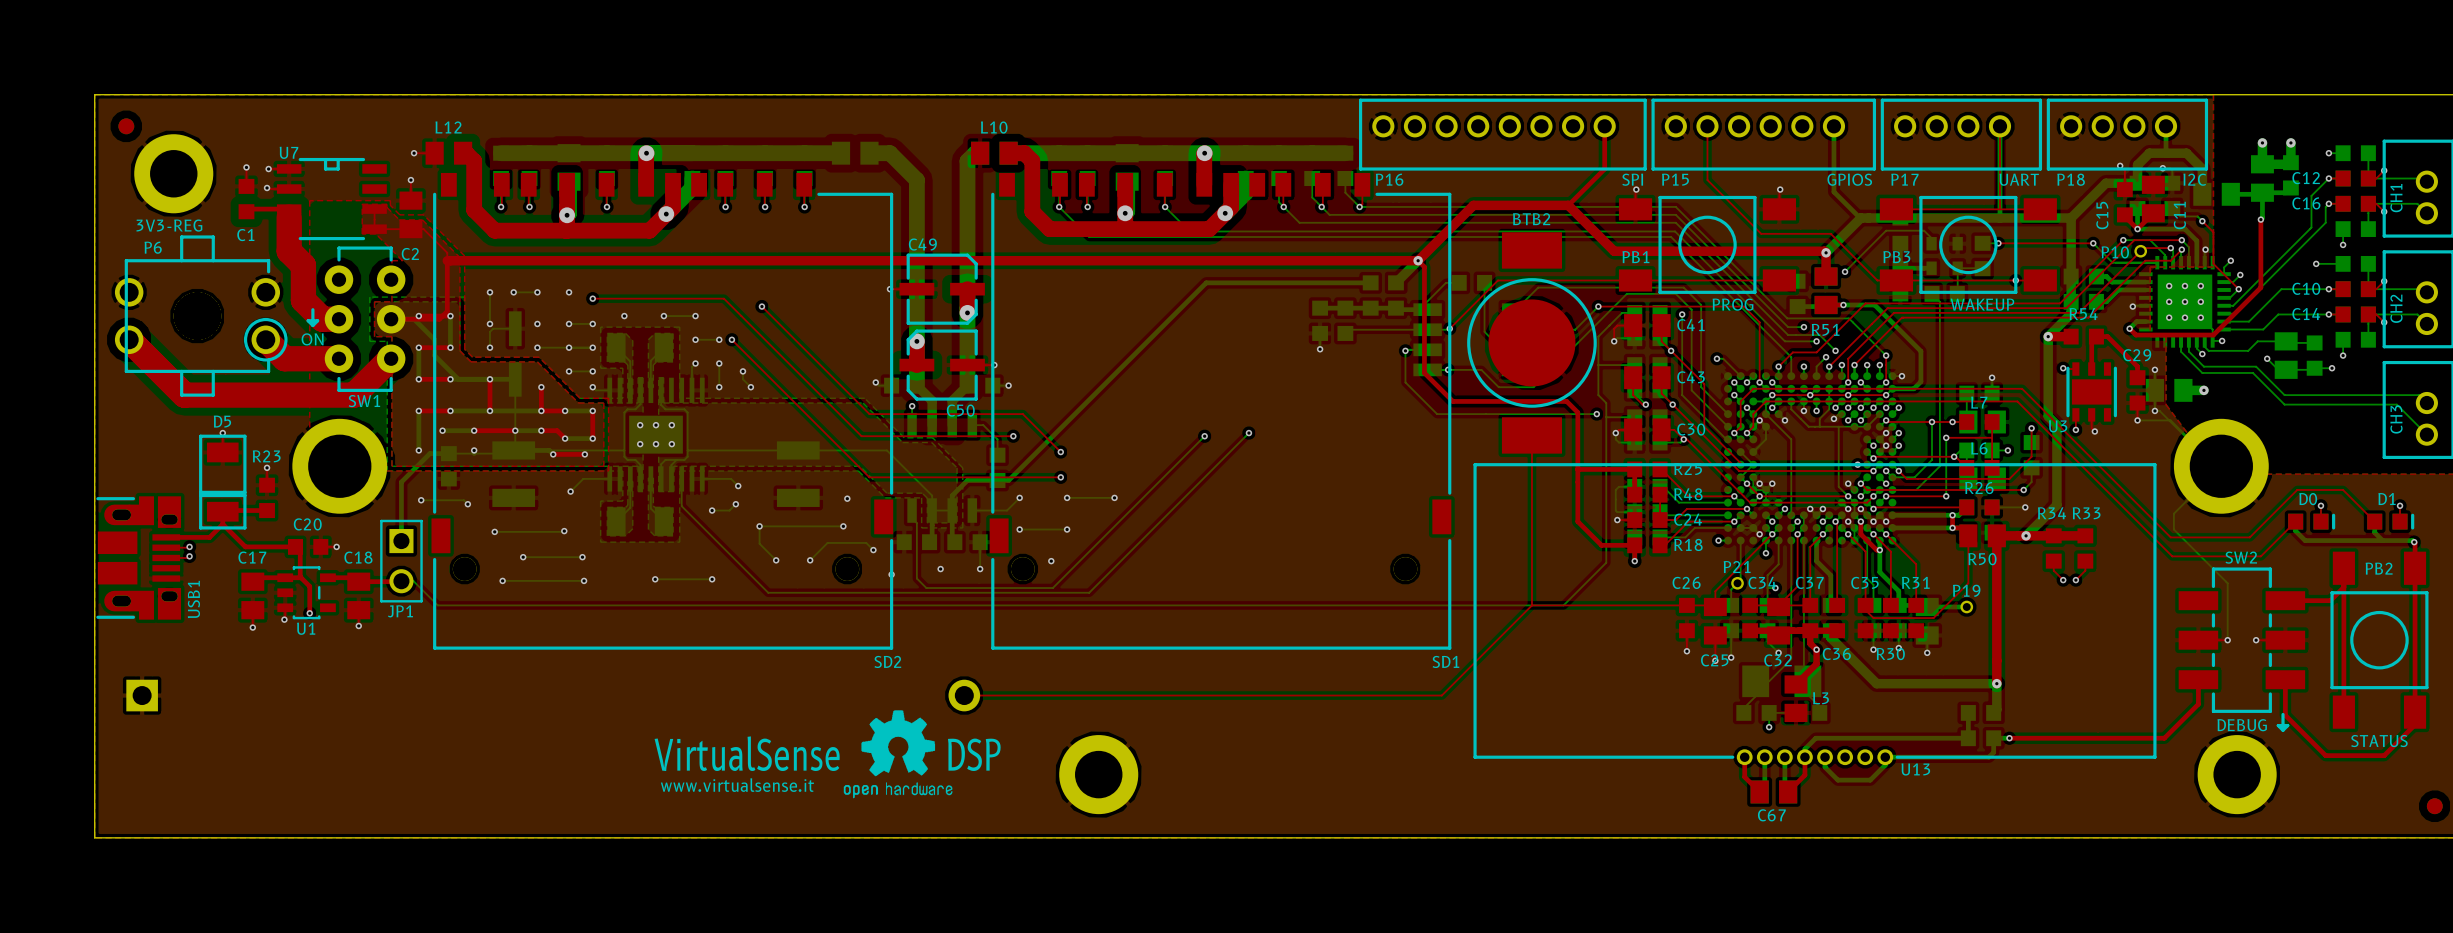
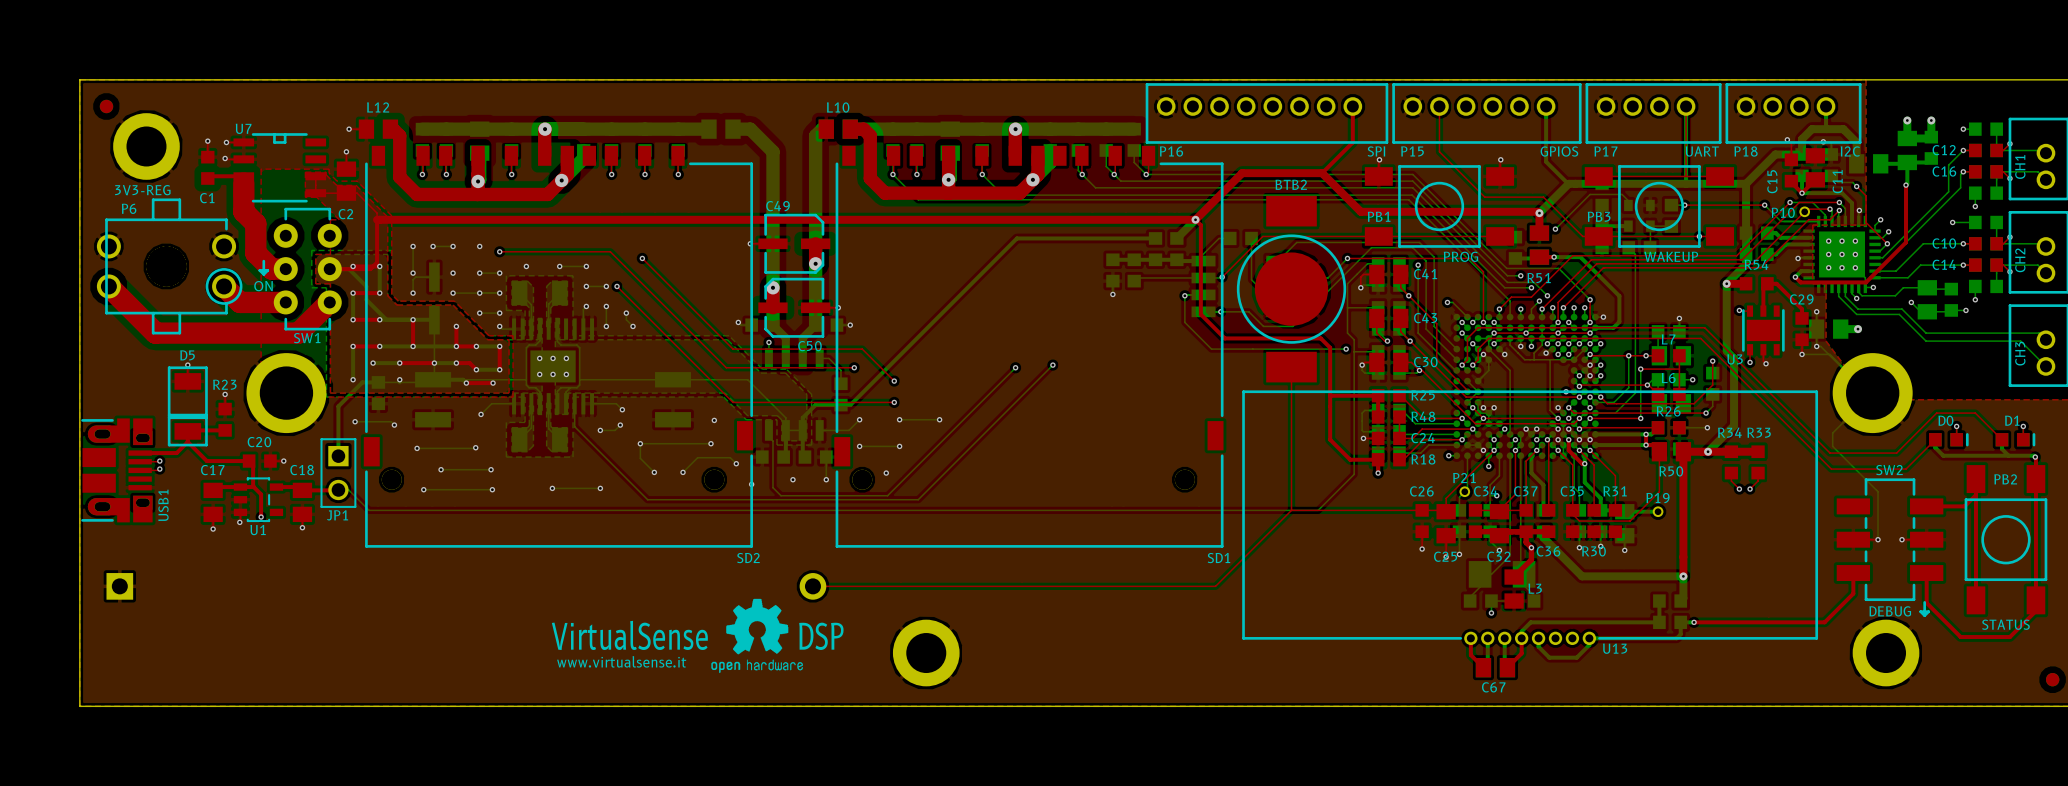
USB1 footprint: [96, 496, 182, 620] -> [81, 418, 153, 523]

